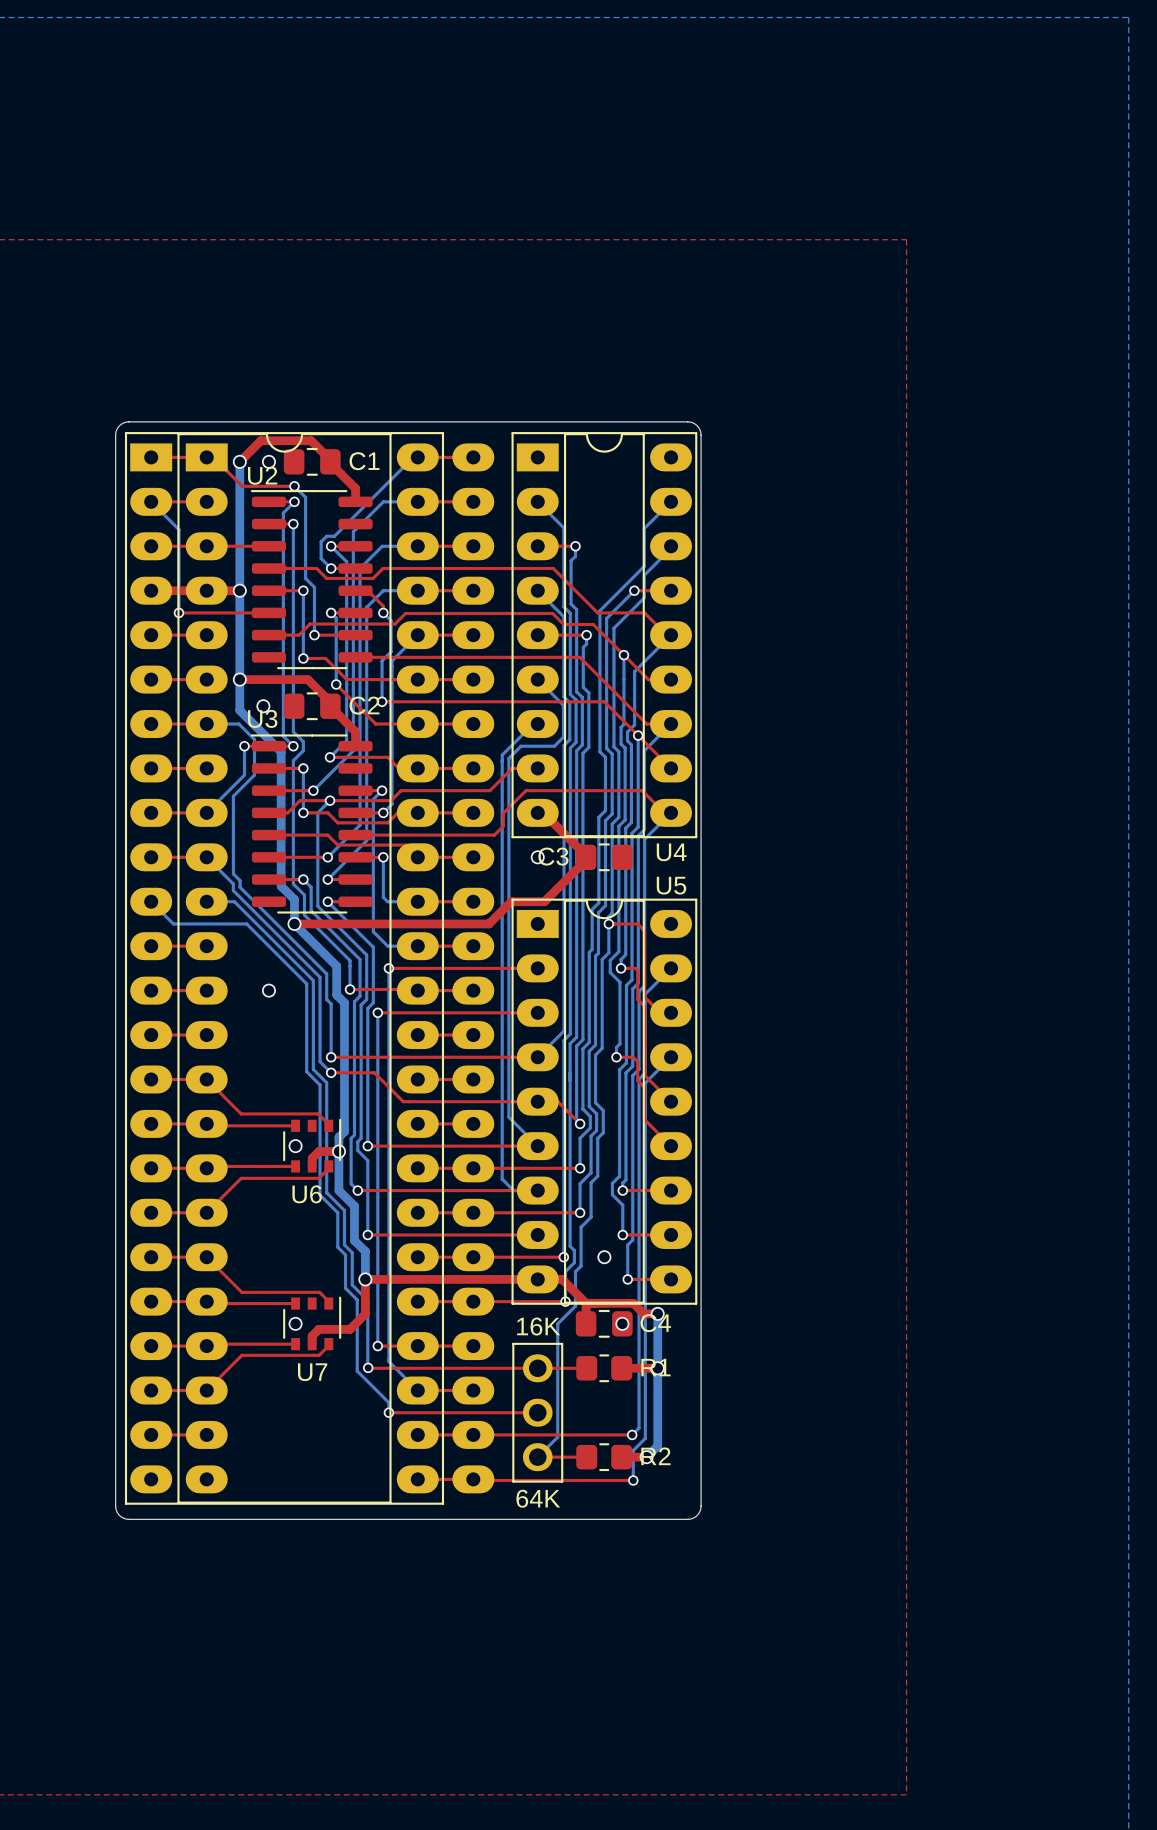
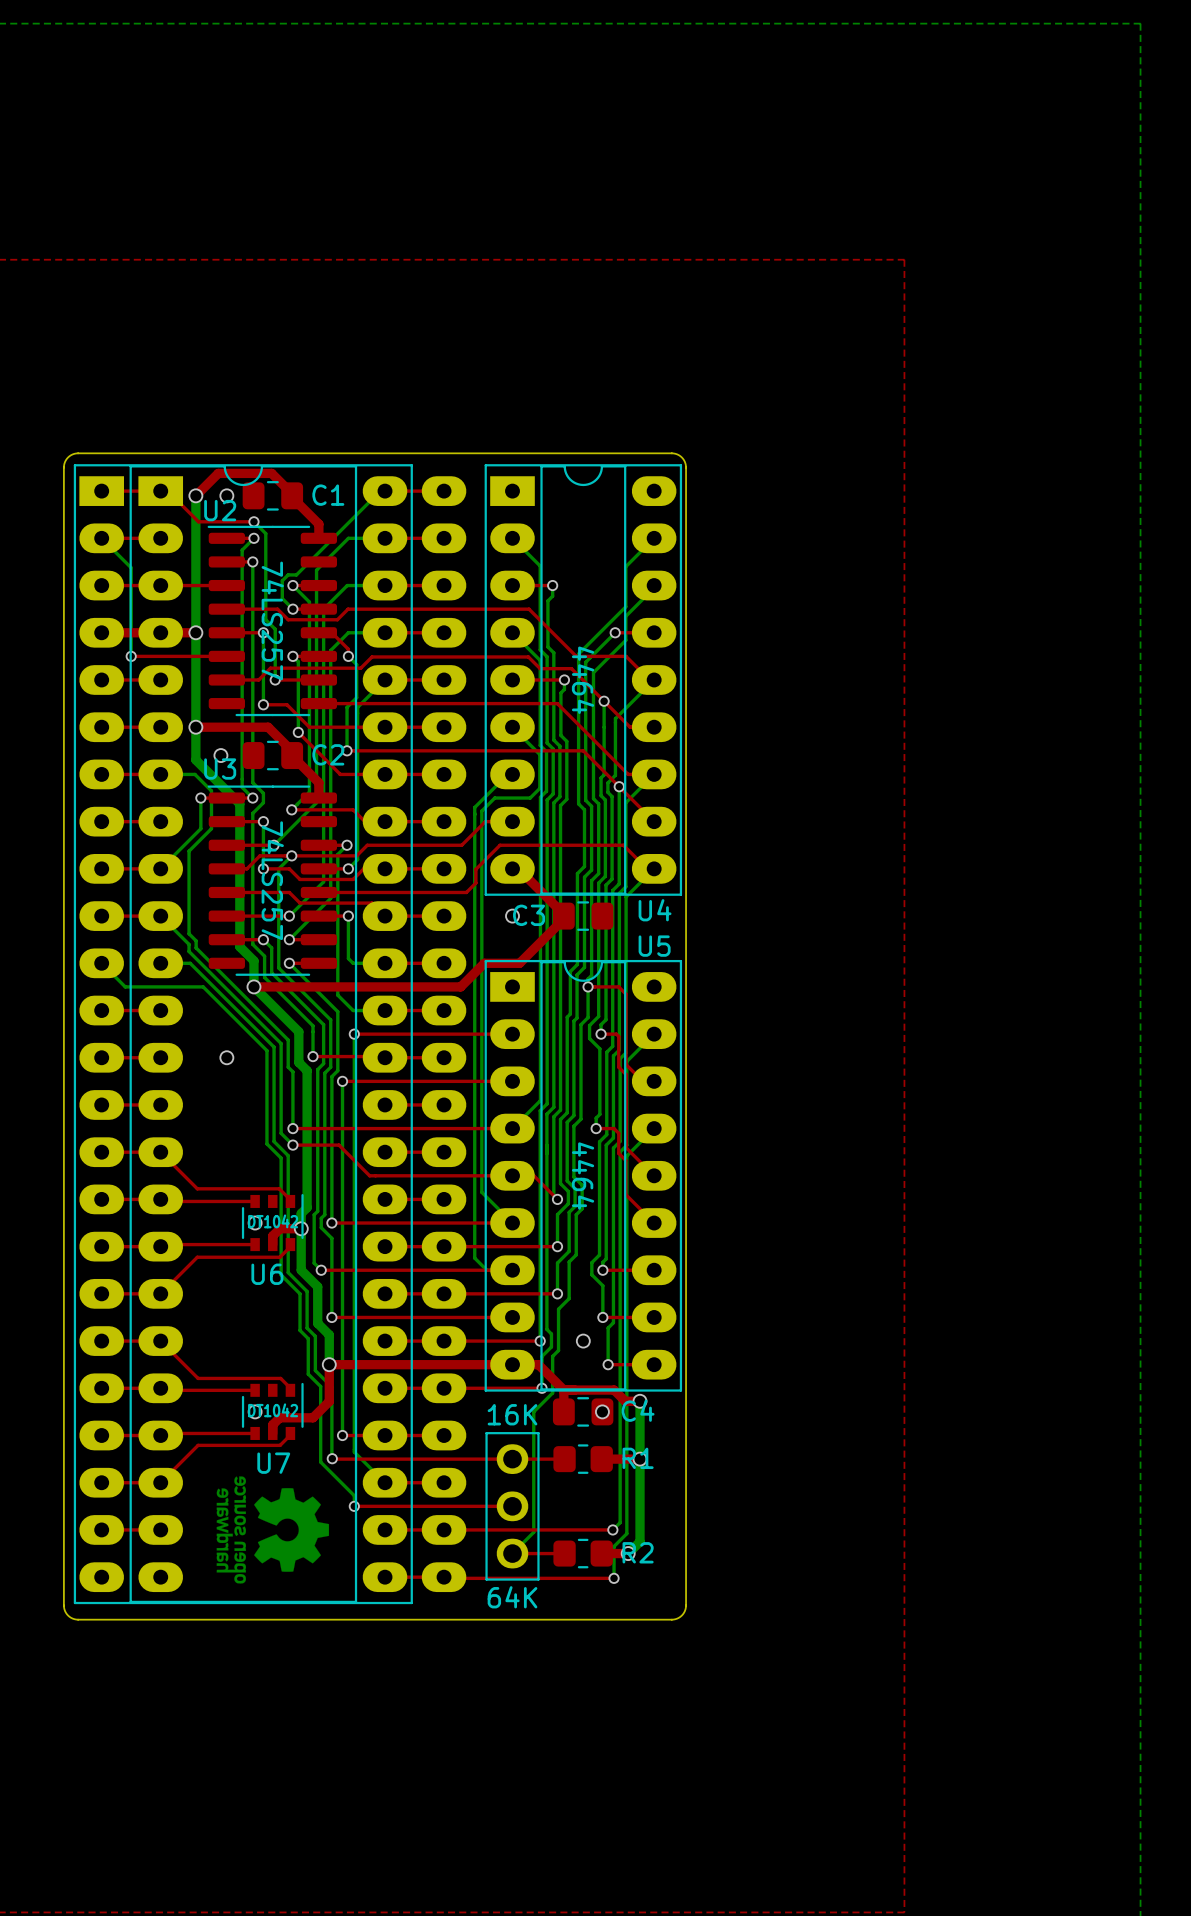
U2 value: none -> 74LS257 (272, 620)
U4 value: none -> 4464 (583, 680)
U3 value: none -> 74LS257 (272, 880)
U5 value: none -> 4464 (583, 1176)
U6 value: none -> DT1042 (273, 1221)
U7 value: none -> DT1042 (273, 1410)
drawing: none -> [216, 1476, 330, 1584]

